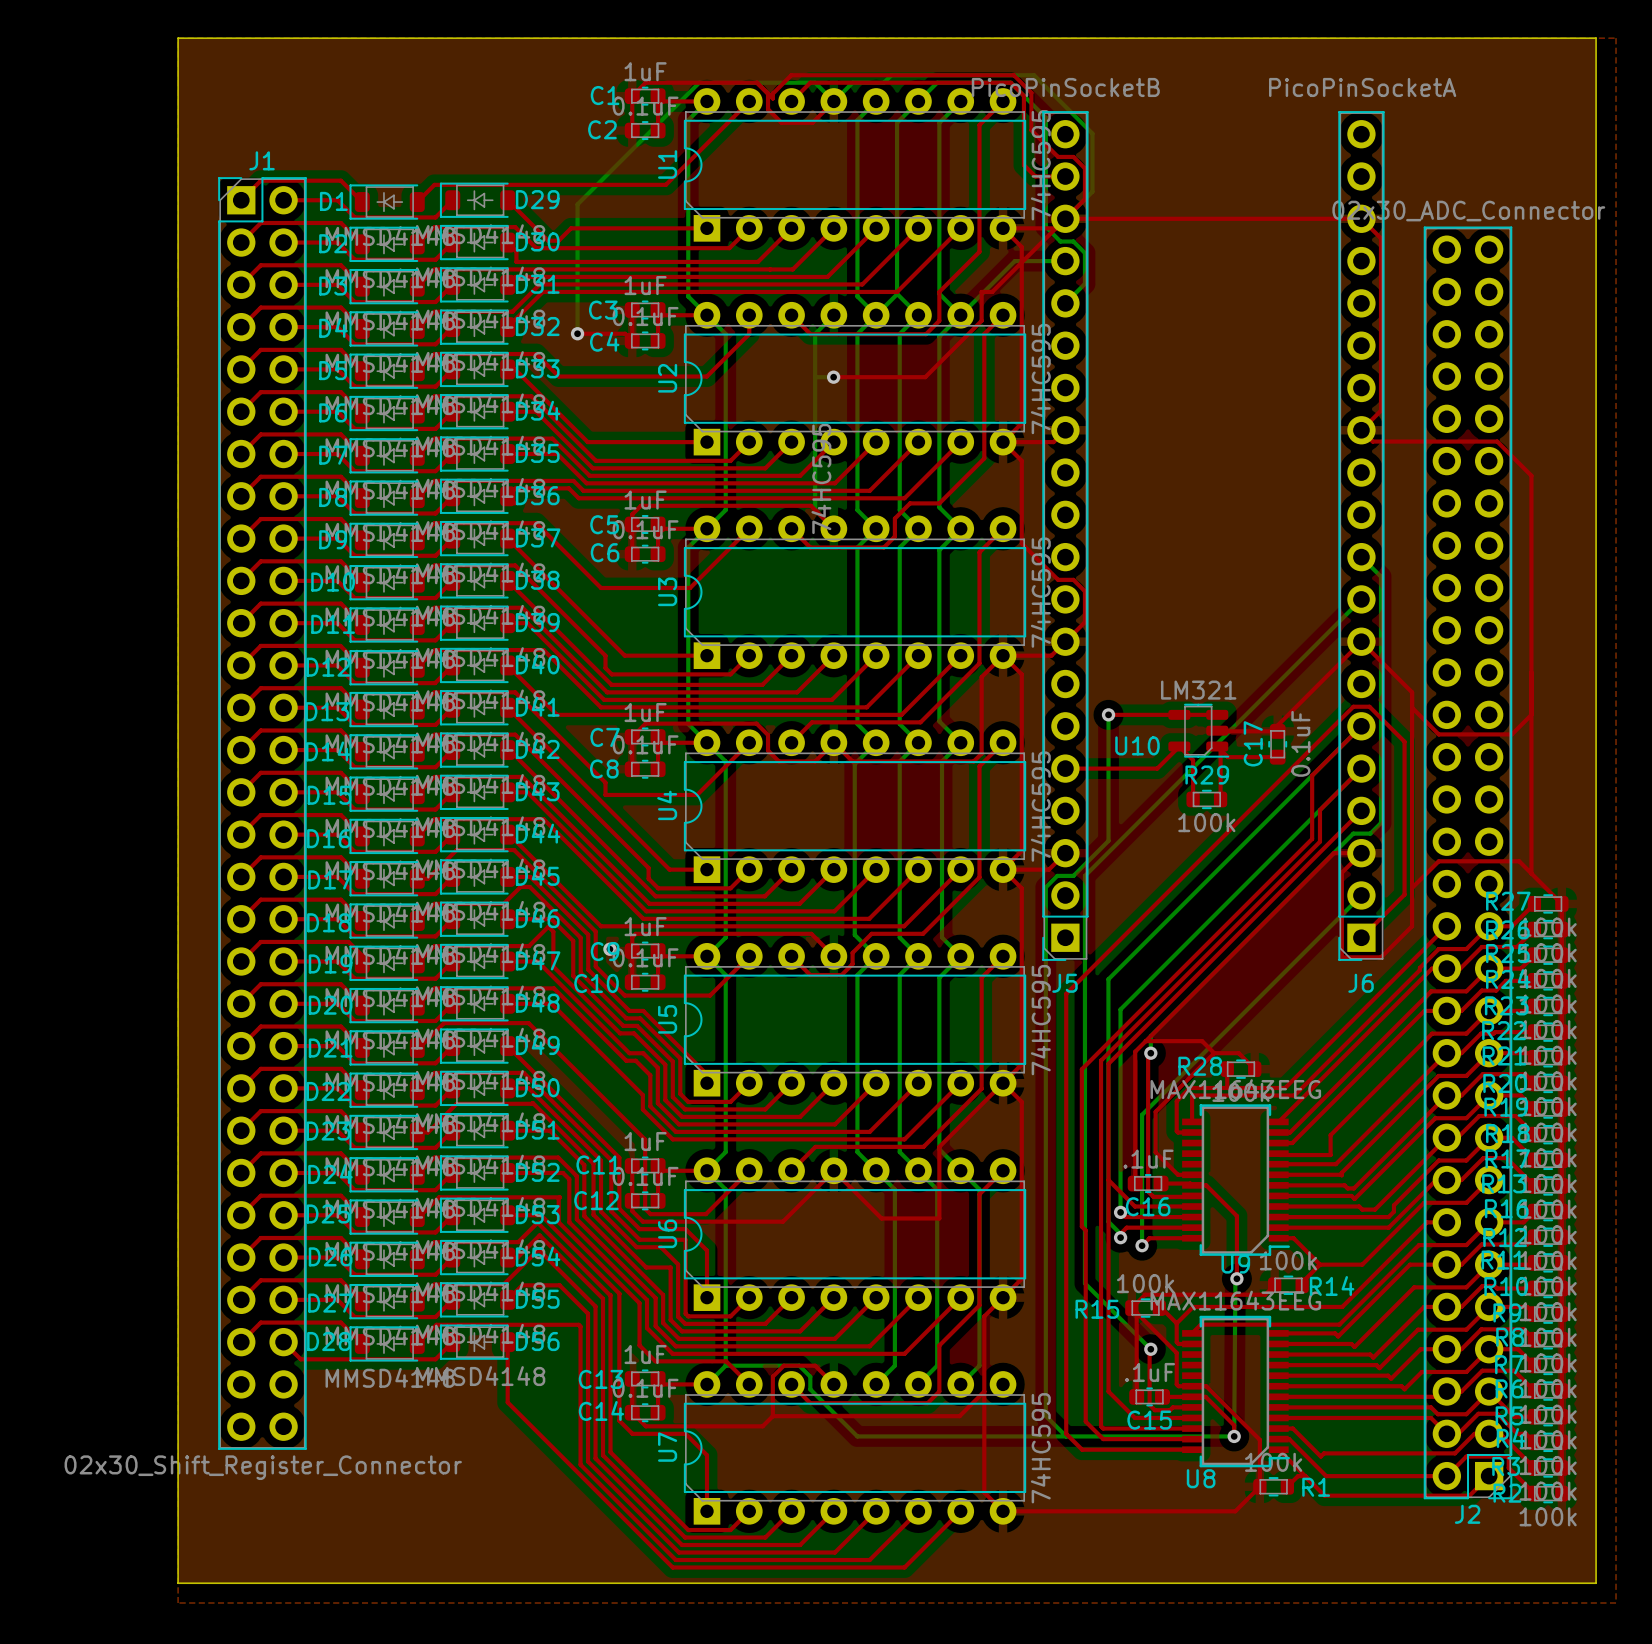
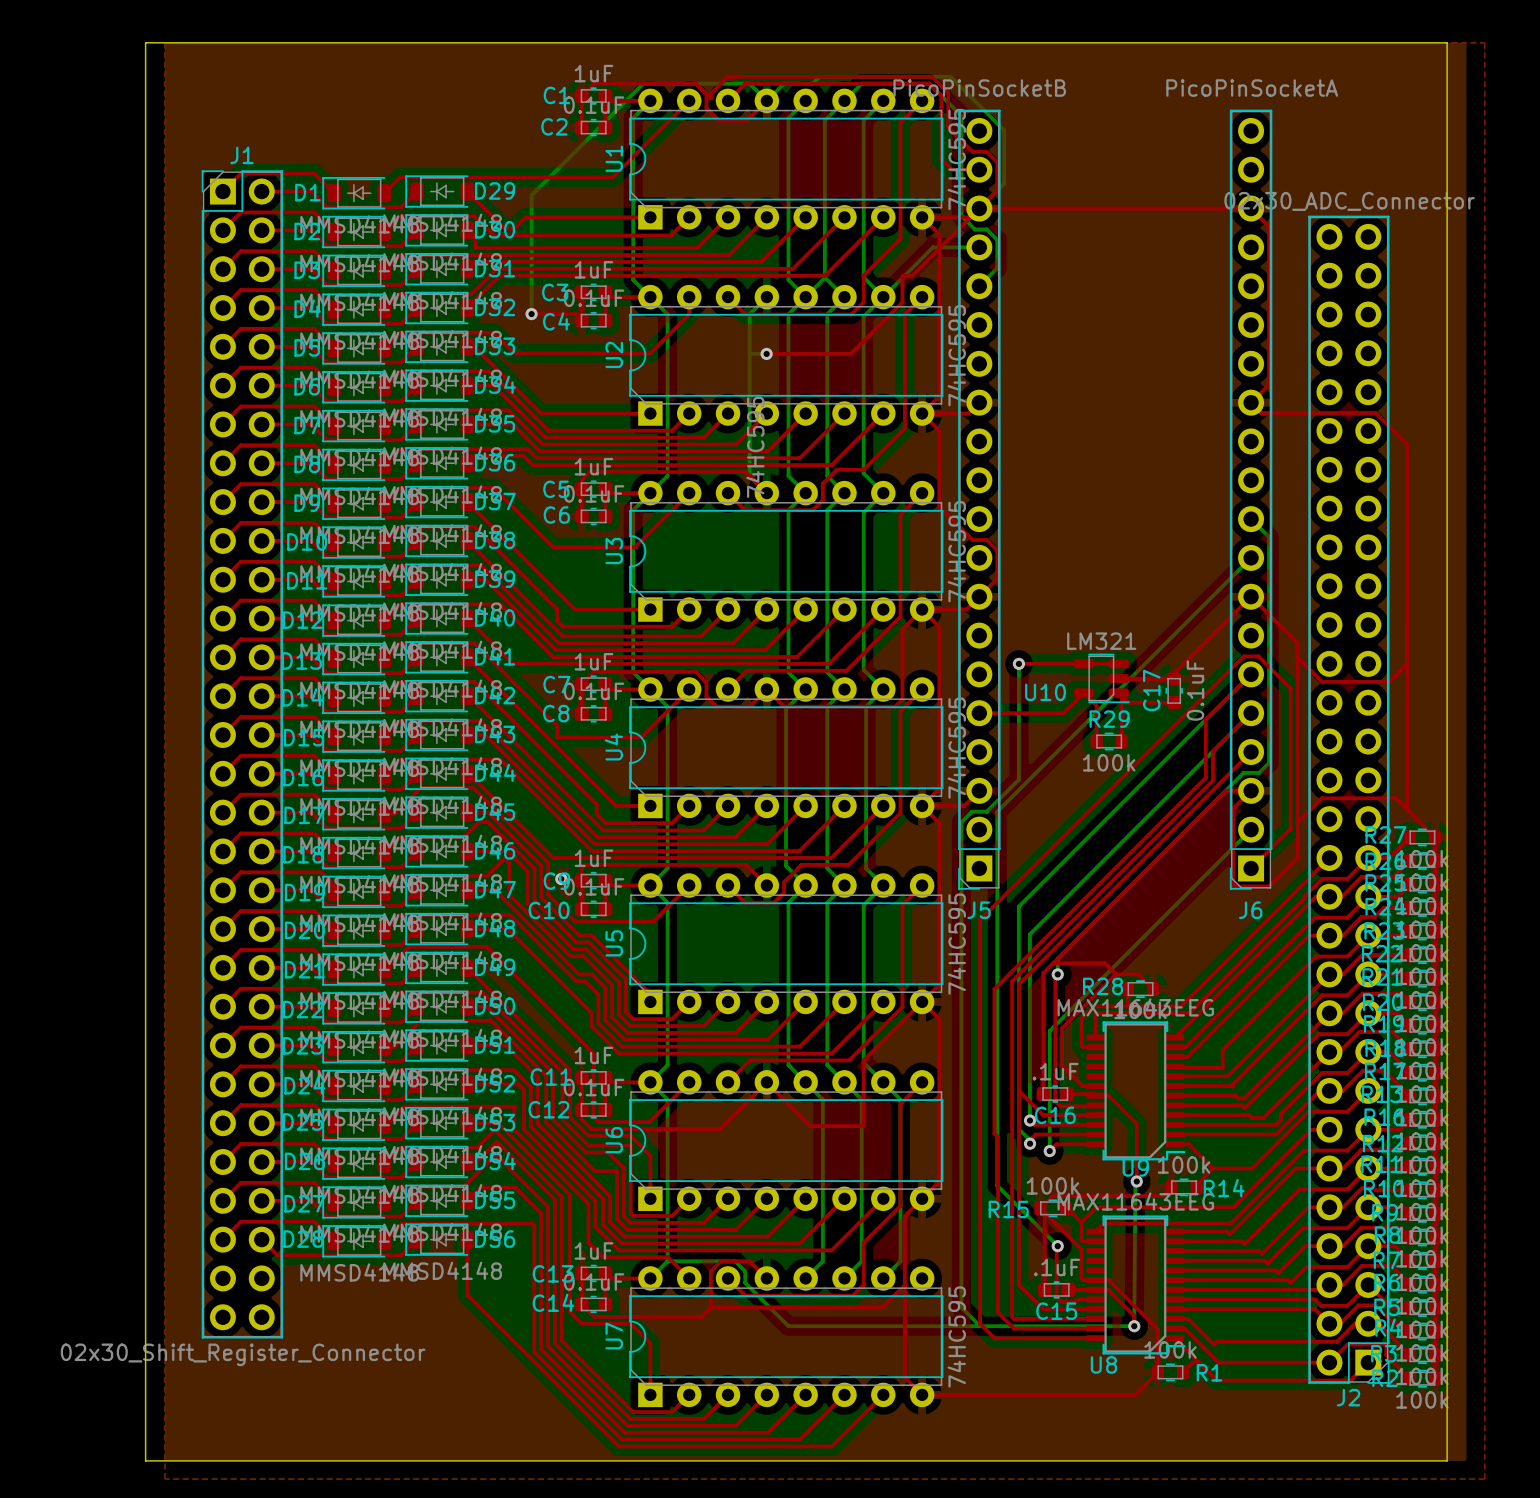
board edge: (178, 38) (178, 1583) -> (164, 42) (145, 42) (145, 1460) (164, 1460)
board edge: (1575, 38) (1596, 38) (1596, 1583) (1575, 1583) -> (1447, 42) (1447, 1460)

